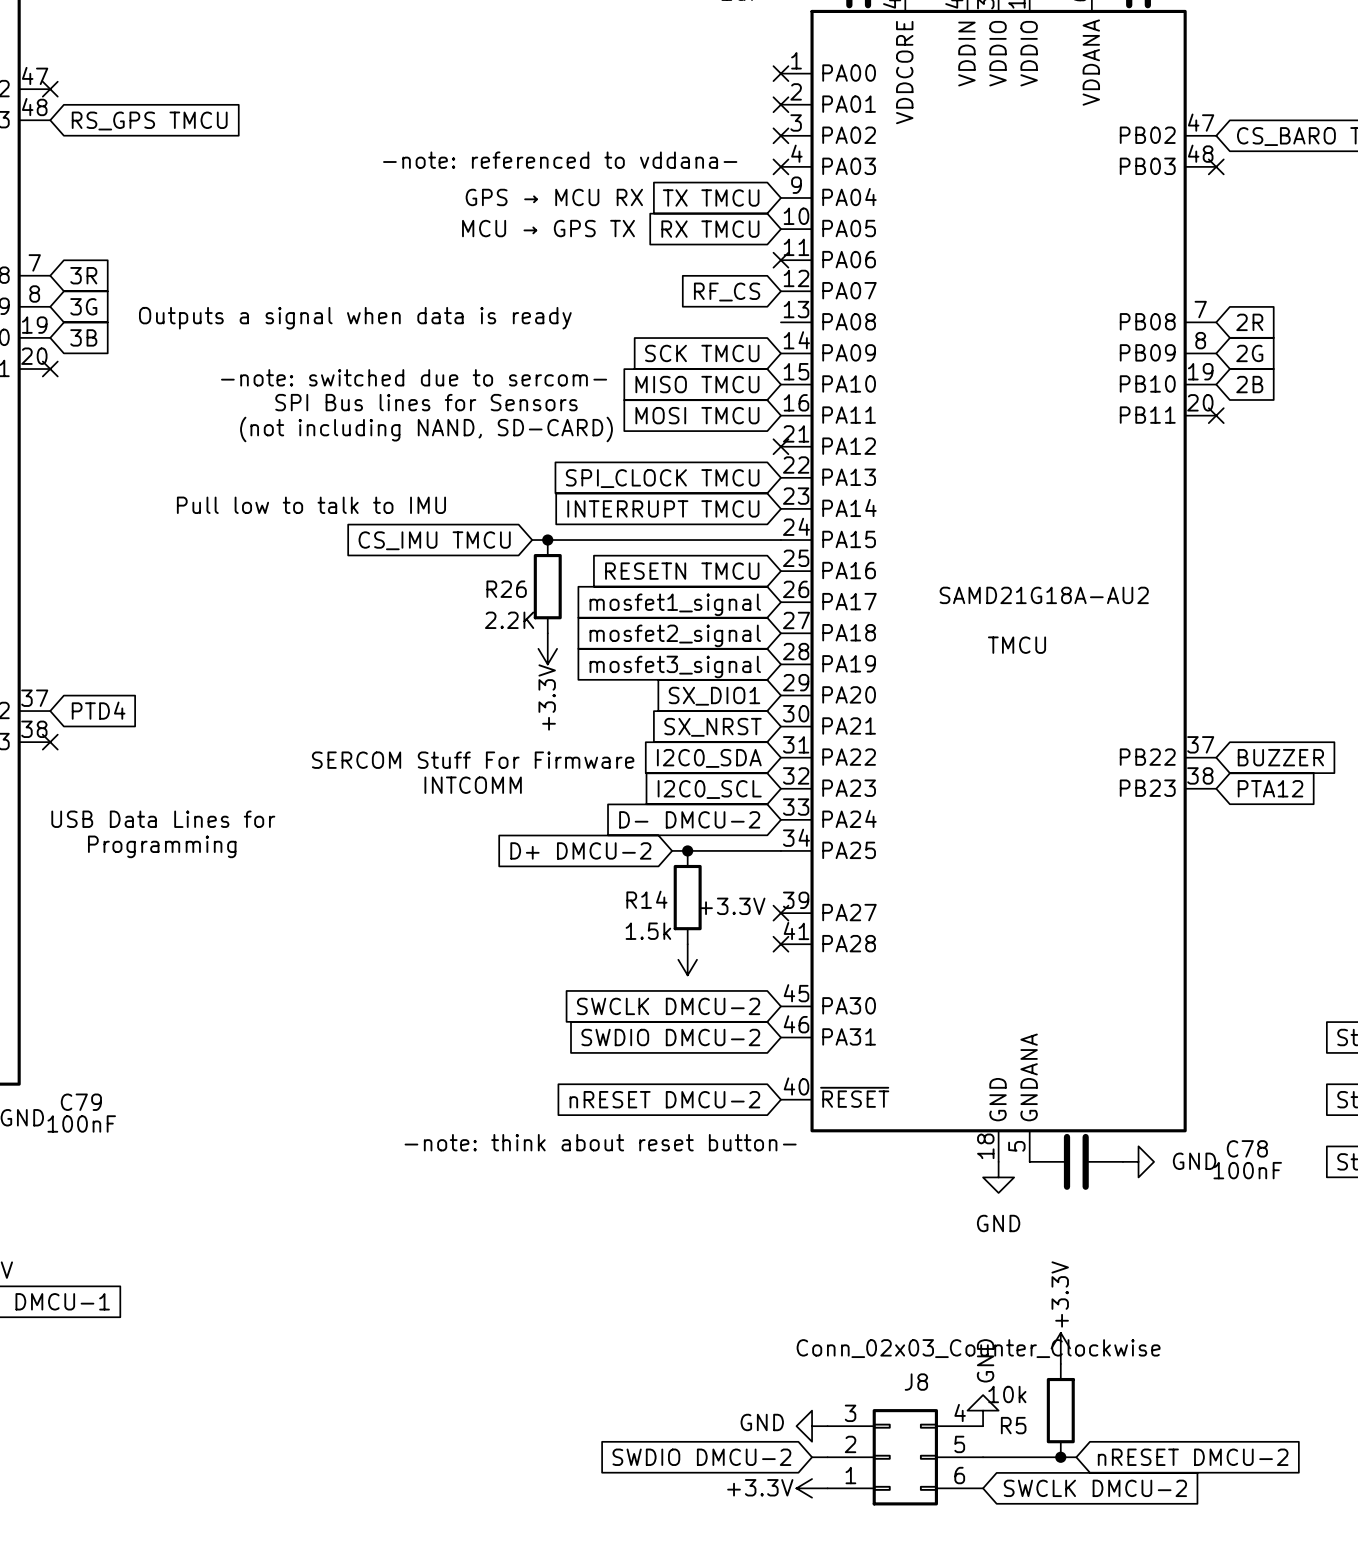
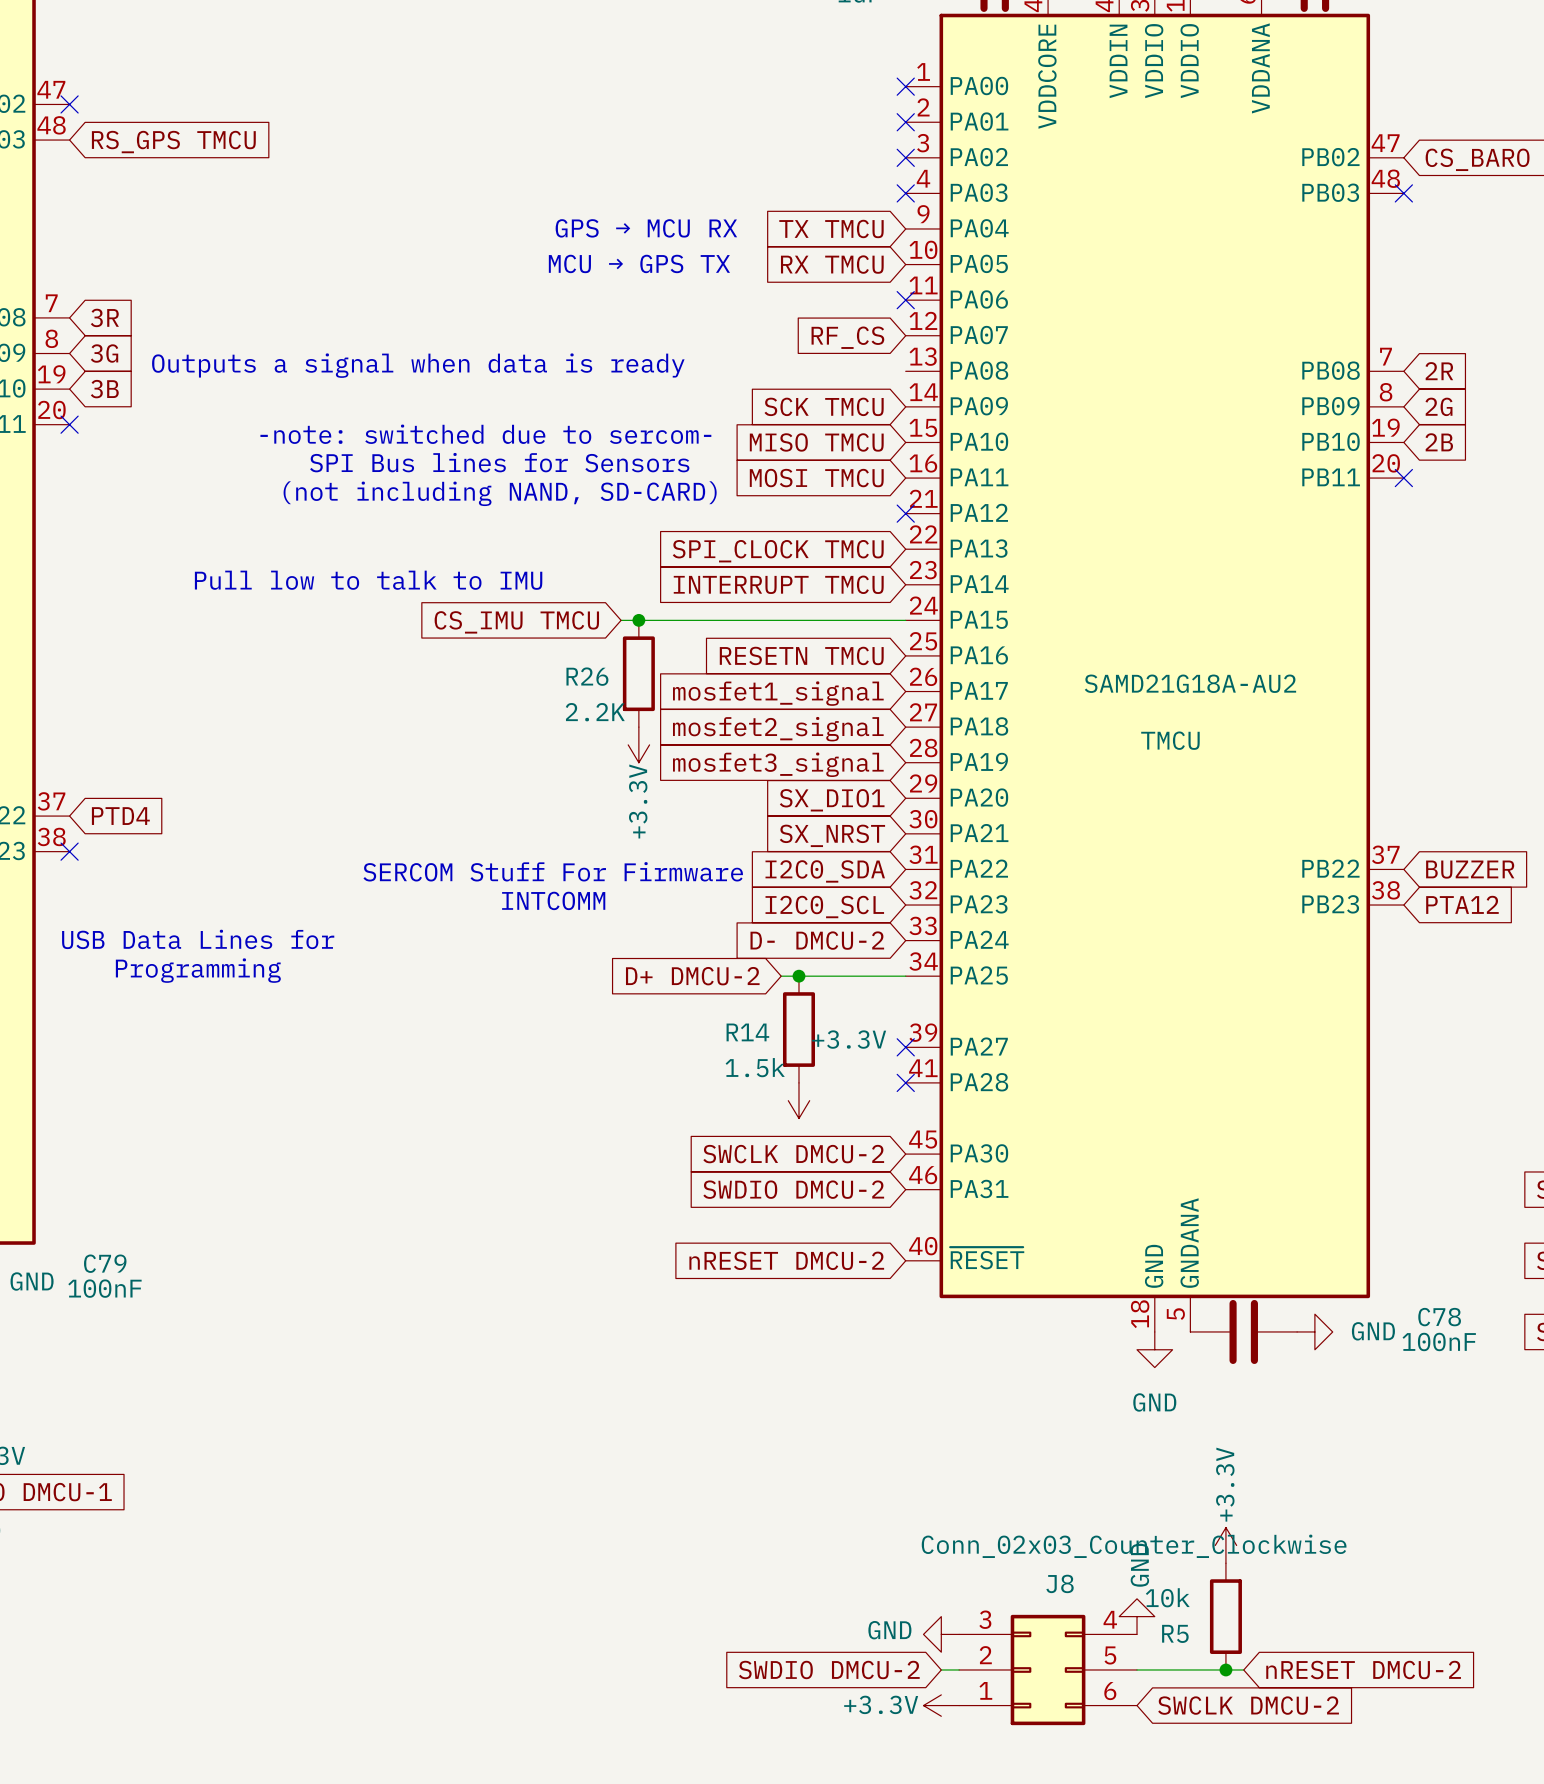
text: -note: referenced to vddana- (560, 160) -> none
text: -note: think about reset button- (600, 1142) -> none

